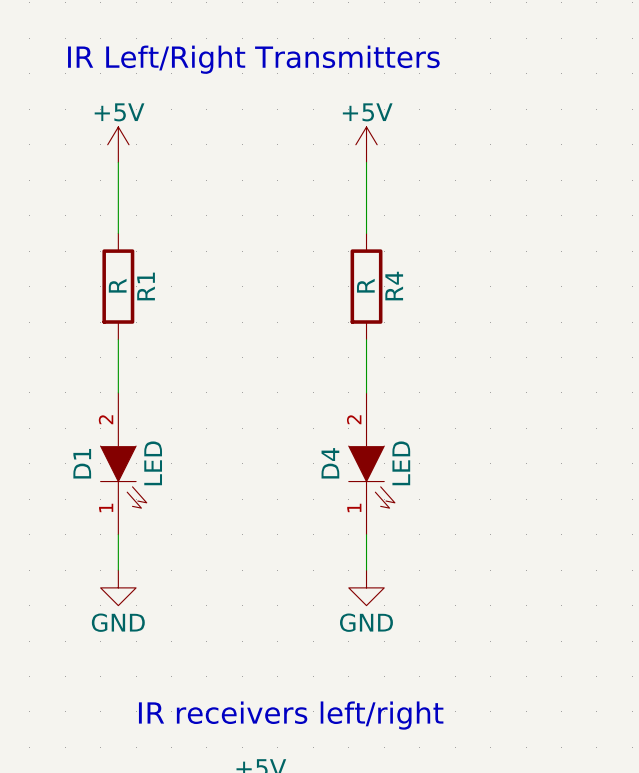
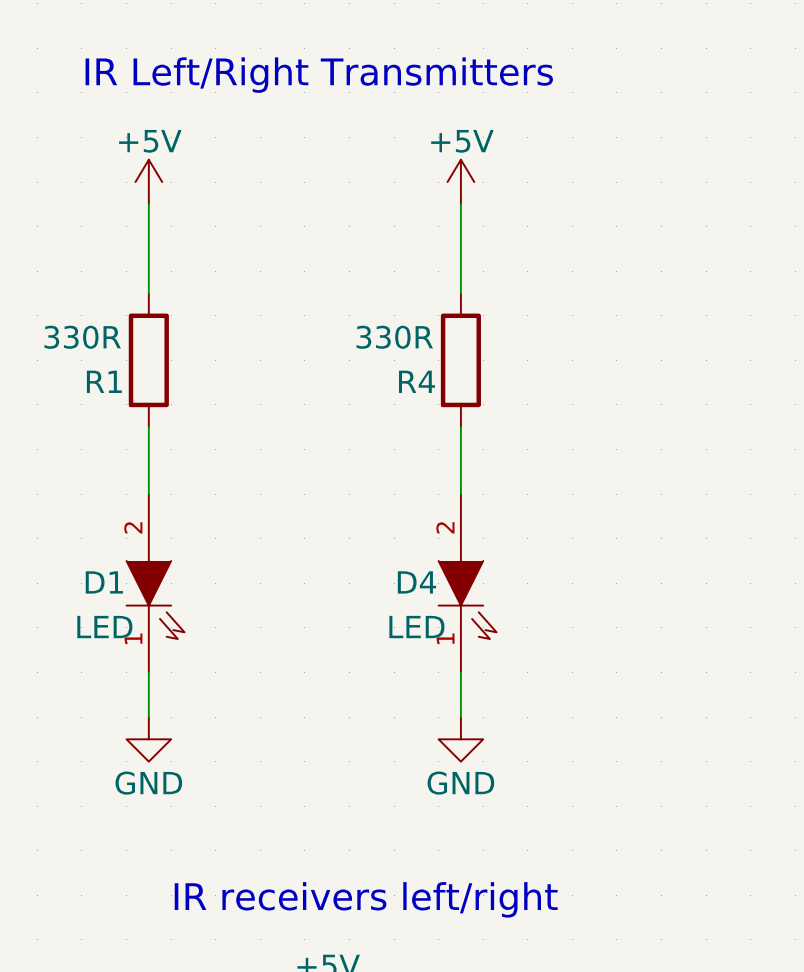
R1 value: R (117, 285) -> 330R (82, 337)
R4 value: R (365, 285) -> 330R (394, 337)
R1 name rotation: 0° (146, 286) -> 90° clockwise (104, 381)
R1 name position: R1 (146, 286) -> R1 (104, 381)
R4 name rotation: 0° (394, 286) -> 90° clockwise (416, 381)
R4 name position: R4 (394, 286) -> R4 (416, 381)
D1 name rotation: 0° (82, 463) -> 90° clockwise (104, 582)
D1 value rotation: 0° (153, 463) -> 90° clockwise (104, 627)
D1 value position: LED (153, 463) -> LED (104, 627)
D4 name rotation: 0° (330, 463) -> 90° clockwise (416, 582)
D4 value rotation: 0° (401, 463) -> 90° clockwise (416, 627)
D4 value position: LED (401, 463) -> LED (416, 627)

